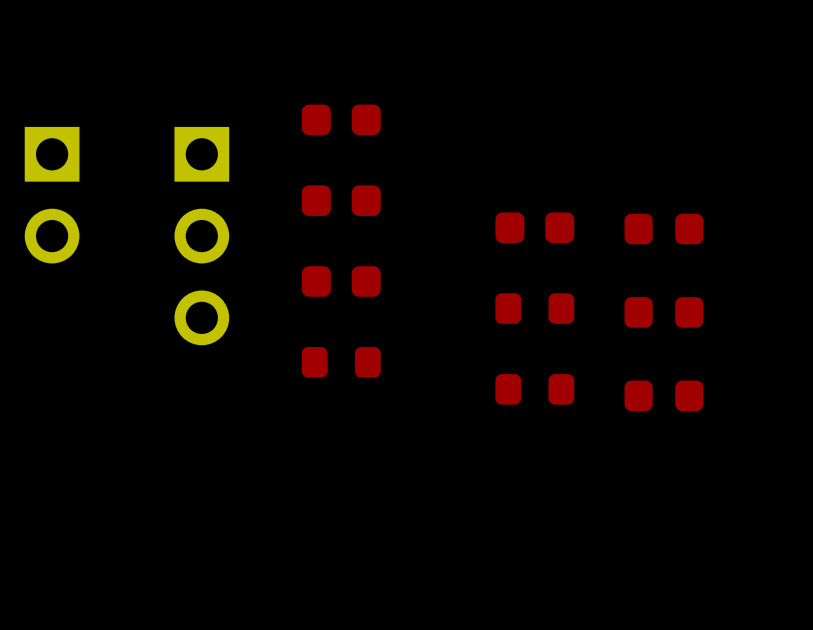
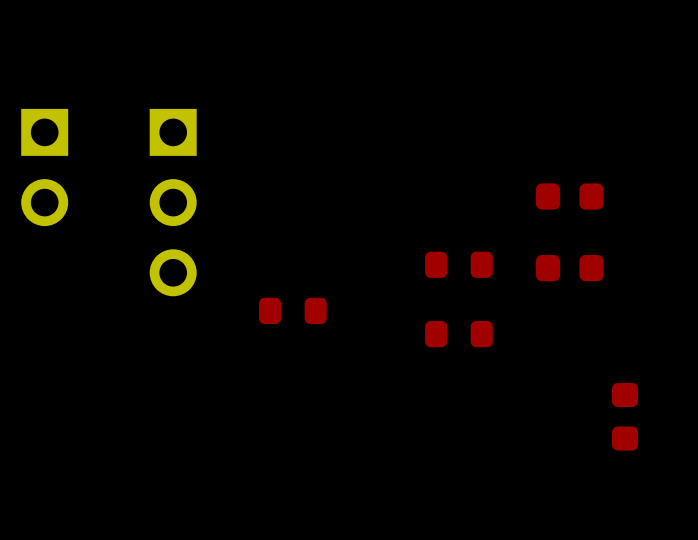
part: (341, 119) -> none
part: (341, 200) -> none
part: (534, 227) -> none
part: (341, 281) -> none
part rotation: 0° (663, 395) -> 90° clockwise (625, 416)
part position: (663, 395) -> (625, 416)

